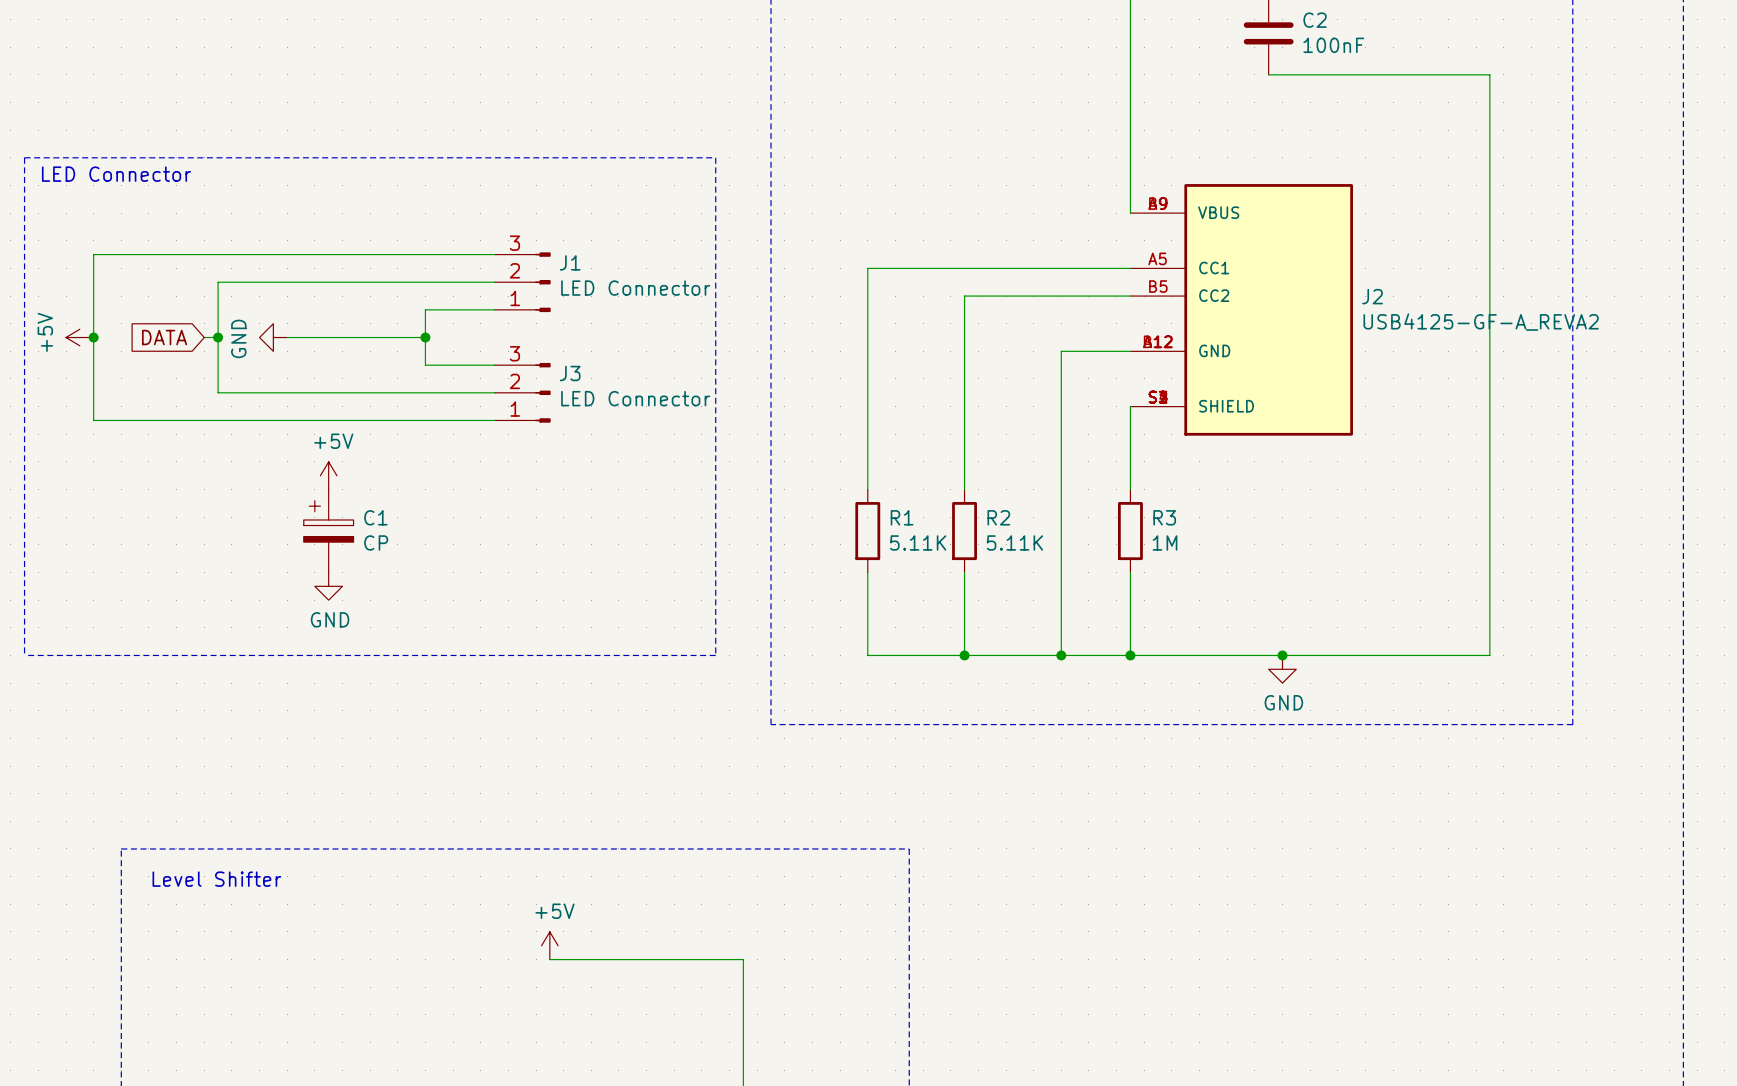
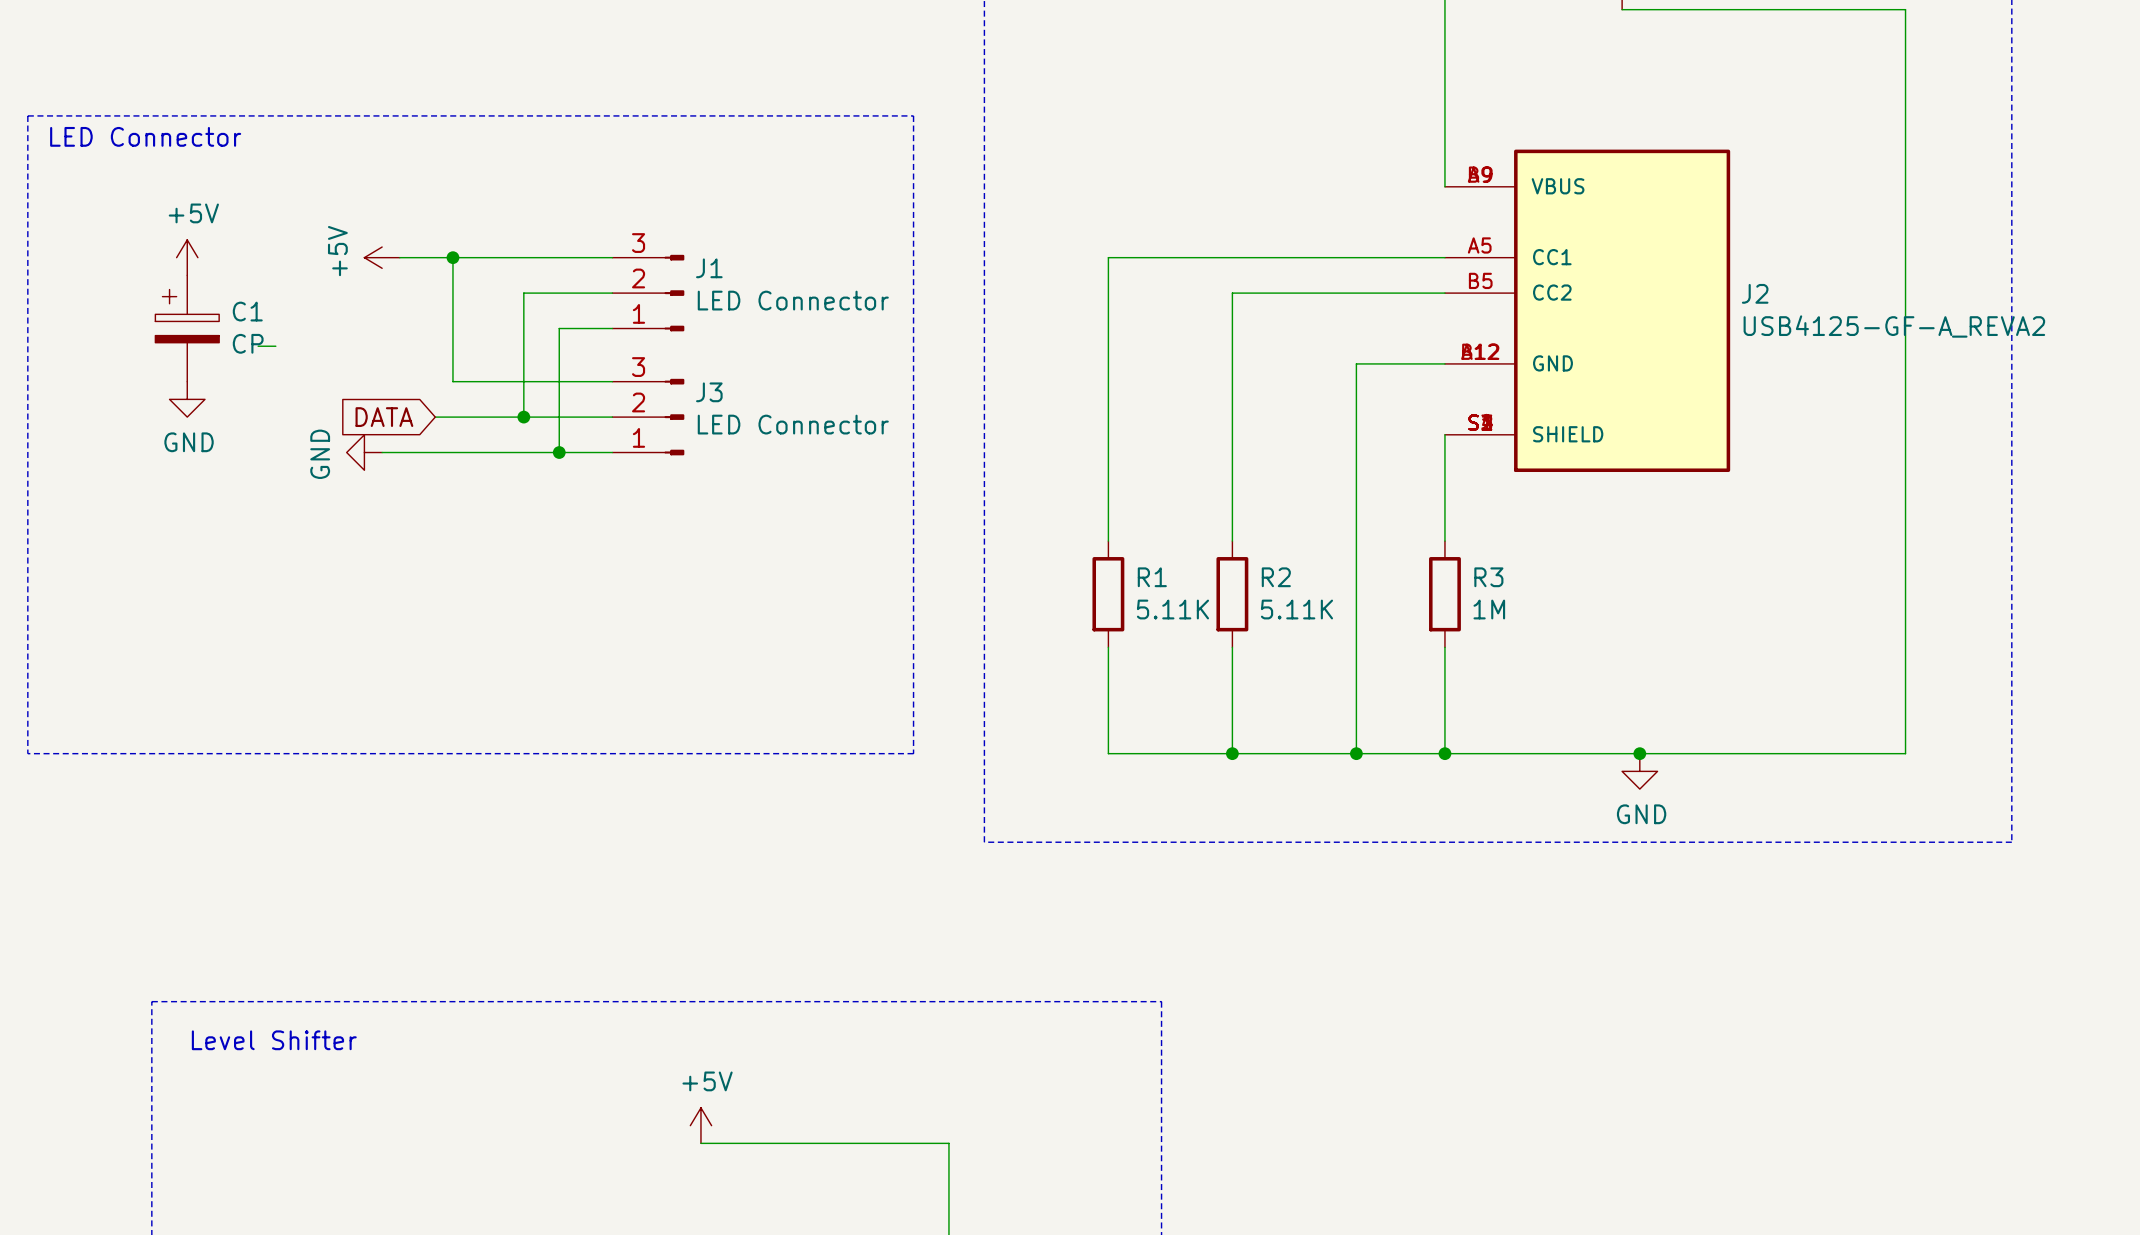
wire: (494, 254) (93, 254) (93, 420) (301, 420) -> none
power symbol: none -> +5V (382, 257)
wire: none -> (399, 257) (612, 257)
junction: none -> (452, 257)
wire: (494, 282) (218, 282) (218, 392) (342, 392) -> none
J1 position: (522, 282) -> (648, 293)
wire: none -> (612, 293) (523, 293) (523, 417)
wire: (494, 309) (425, 309) (425, 365) -> (452, 257) (452, 381) (541, 381)
wire: none -> (612, 328) (559, 328) (559, 452)
power symbol rotation: 0° (79, 337) -> 90° clockwise (187, 257)
power symbol position: +5V (79, 337) -> +5V (187, 257)
junction: (93, 337) -> none
global label position: DATA (164, 337) -> DATA (384, 417)
junction: (218, 337) -> none
power symbol: GND (273, 337) -> none
wire: (287, 337) (425, 337) -> none
junction: (425, 337) -> none
power symbol: none -> GND (187, 399)
junction: none -> (523, 417)
J3 position: (522, 392) -> (648, 417)
power symbol: none -> GND (364, 452)
junction: none -> (559, 452)
power symbol: +5V (328, 475) -> none
C1 position: (328, 531) -> (187, 328)
power symbol: GND (328, 586) -> none

